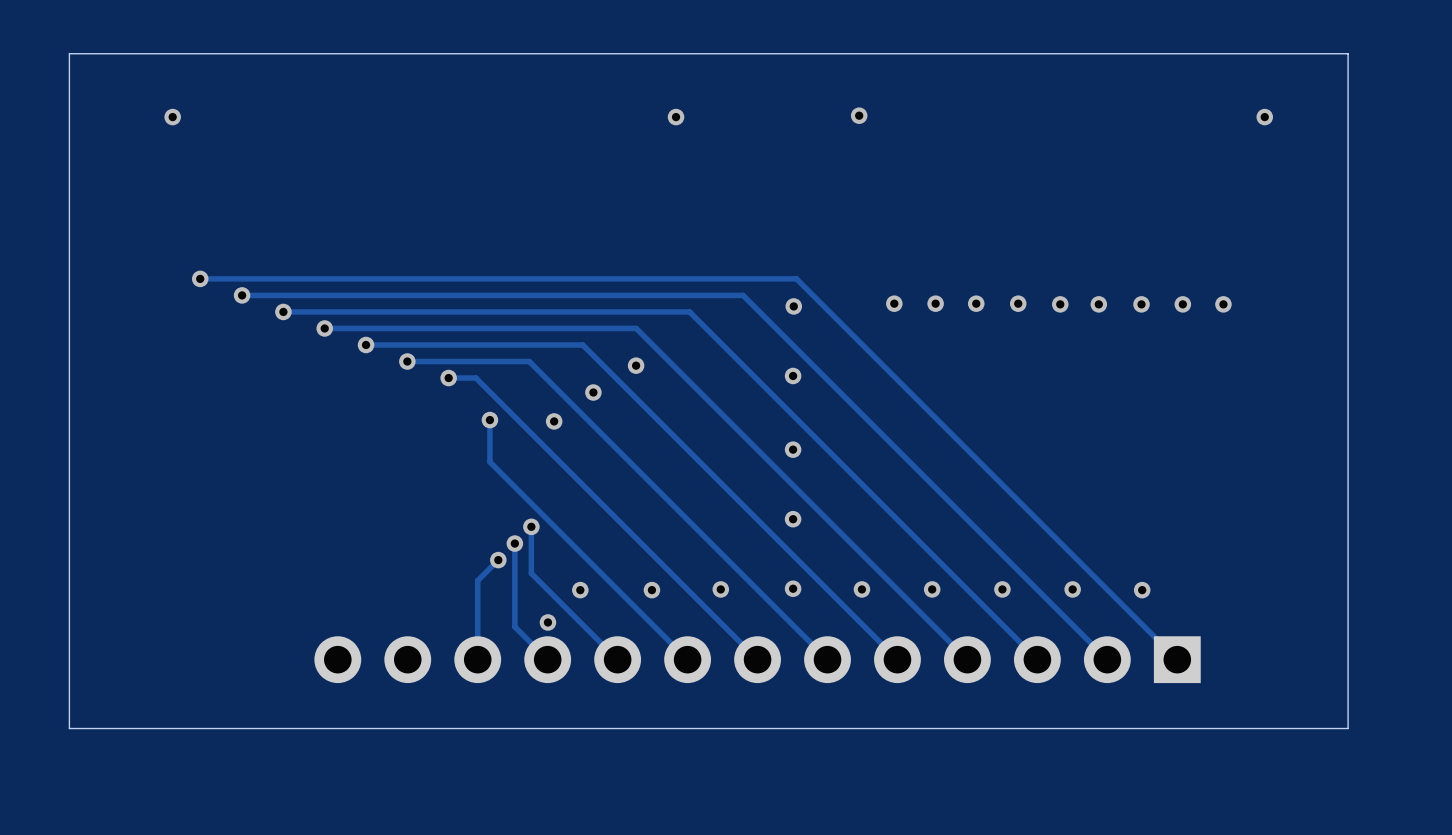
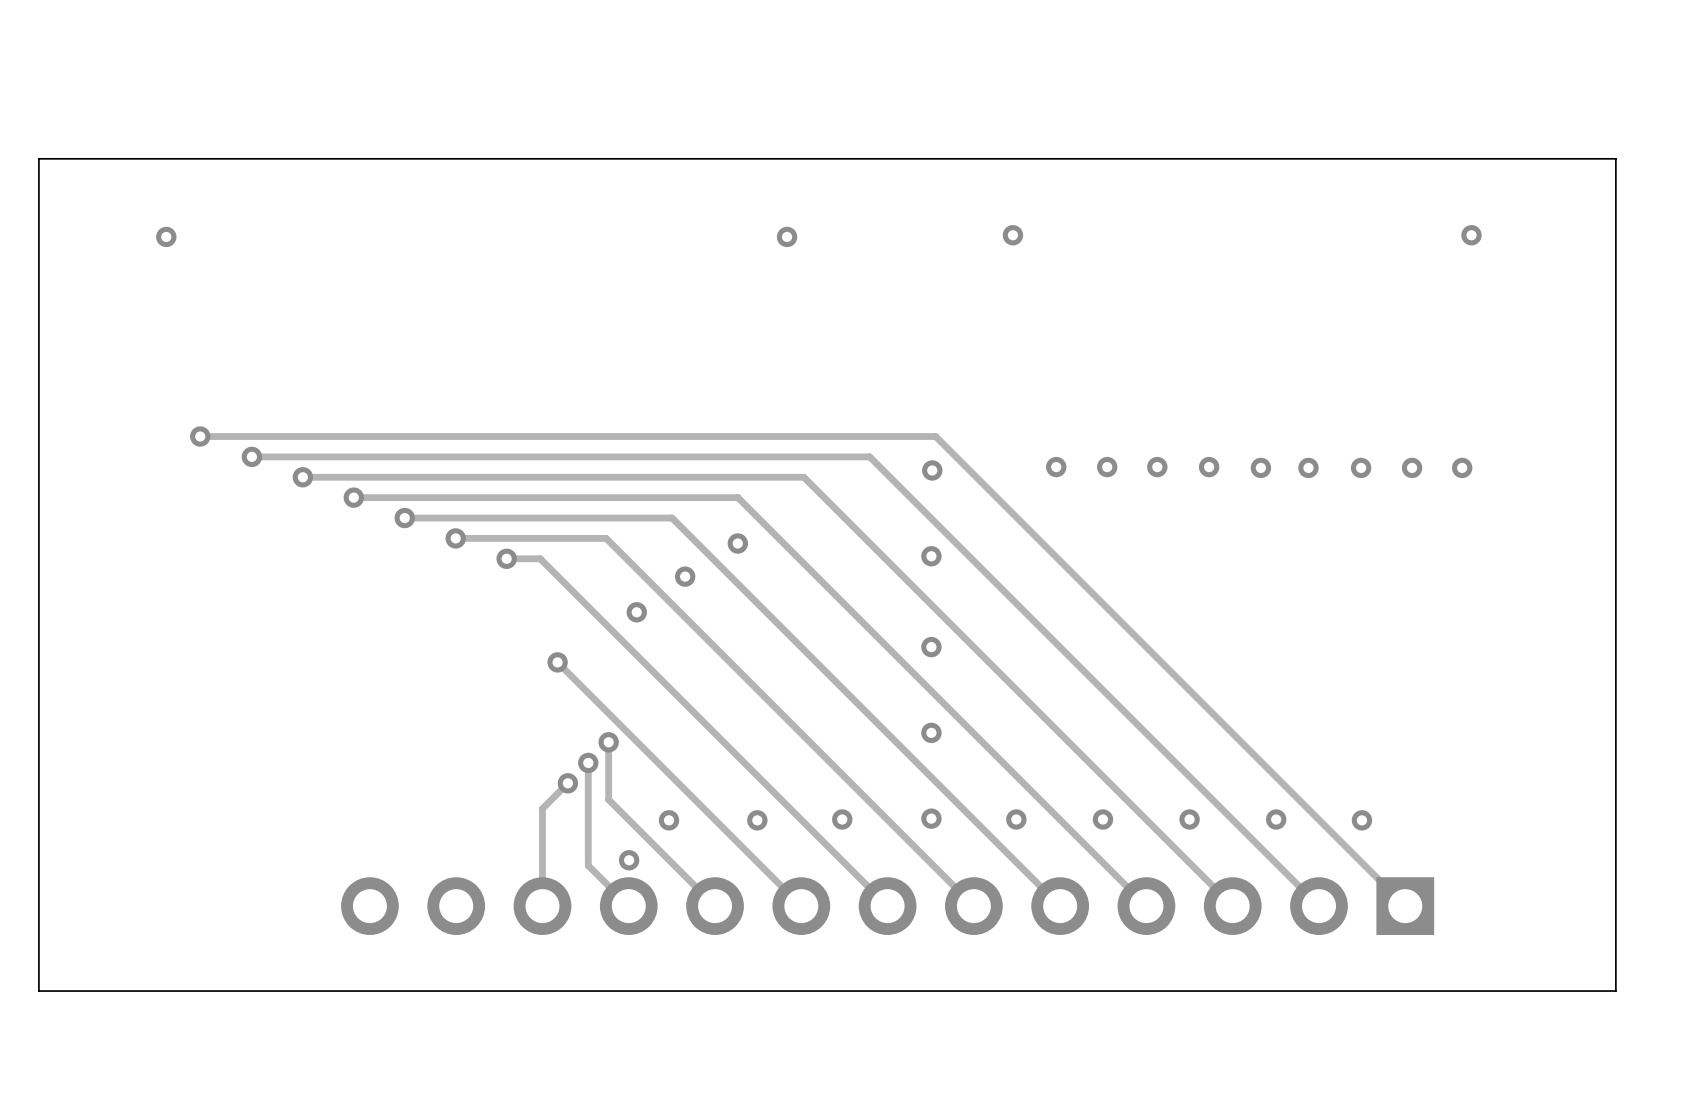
via position: (1264, 117) -> (1471, 235)
track: (489, 420) (489, 462) -> none
via position: (489, 420) -> (557, 662)

